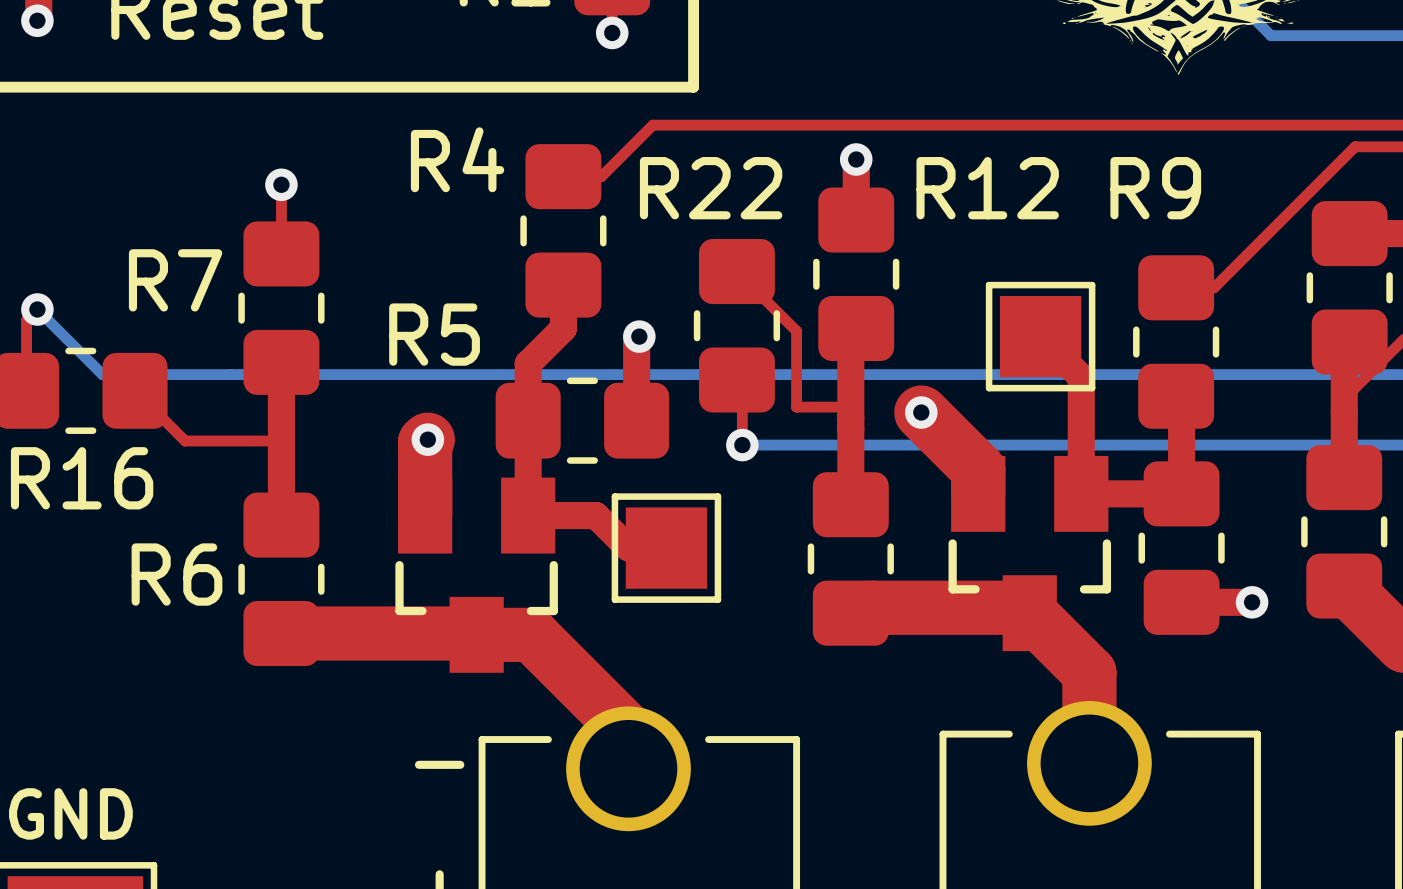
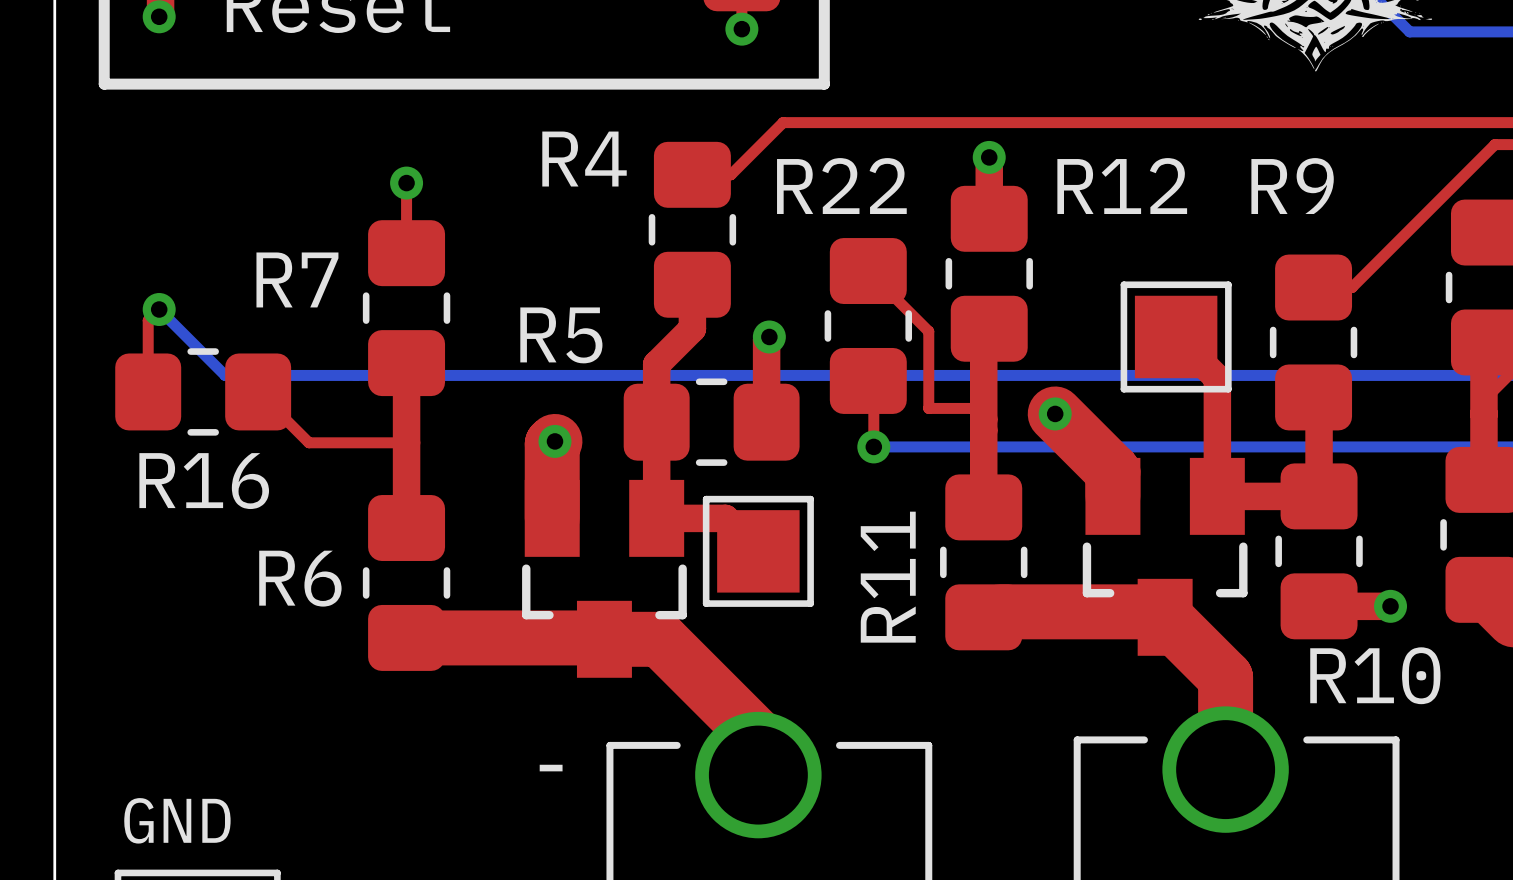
part position: (666, 548) -> (758, 551)
R11 name: none -> R11 (888, 577)
R10 name: none -> R10 (1375, 675)

